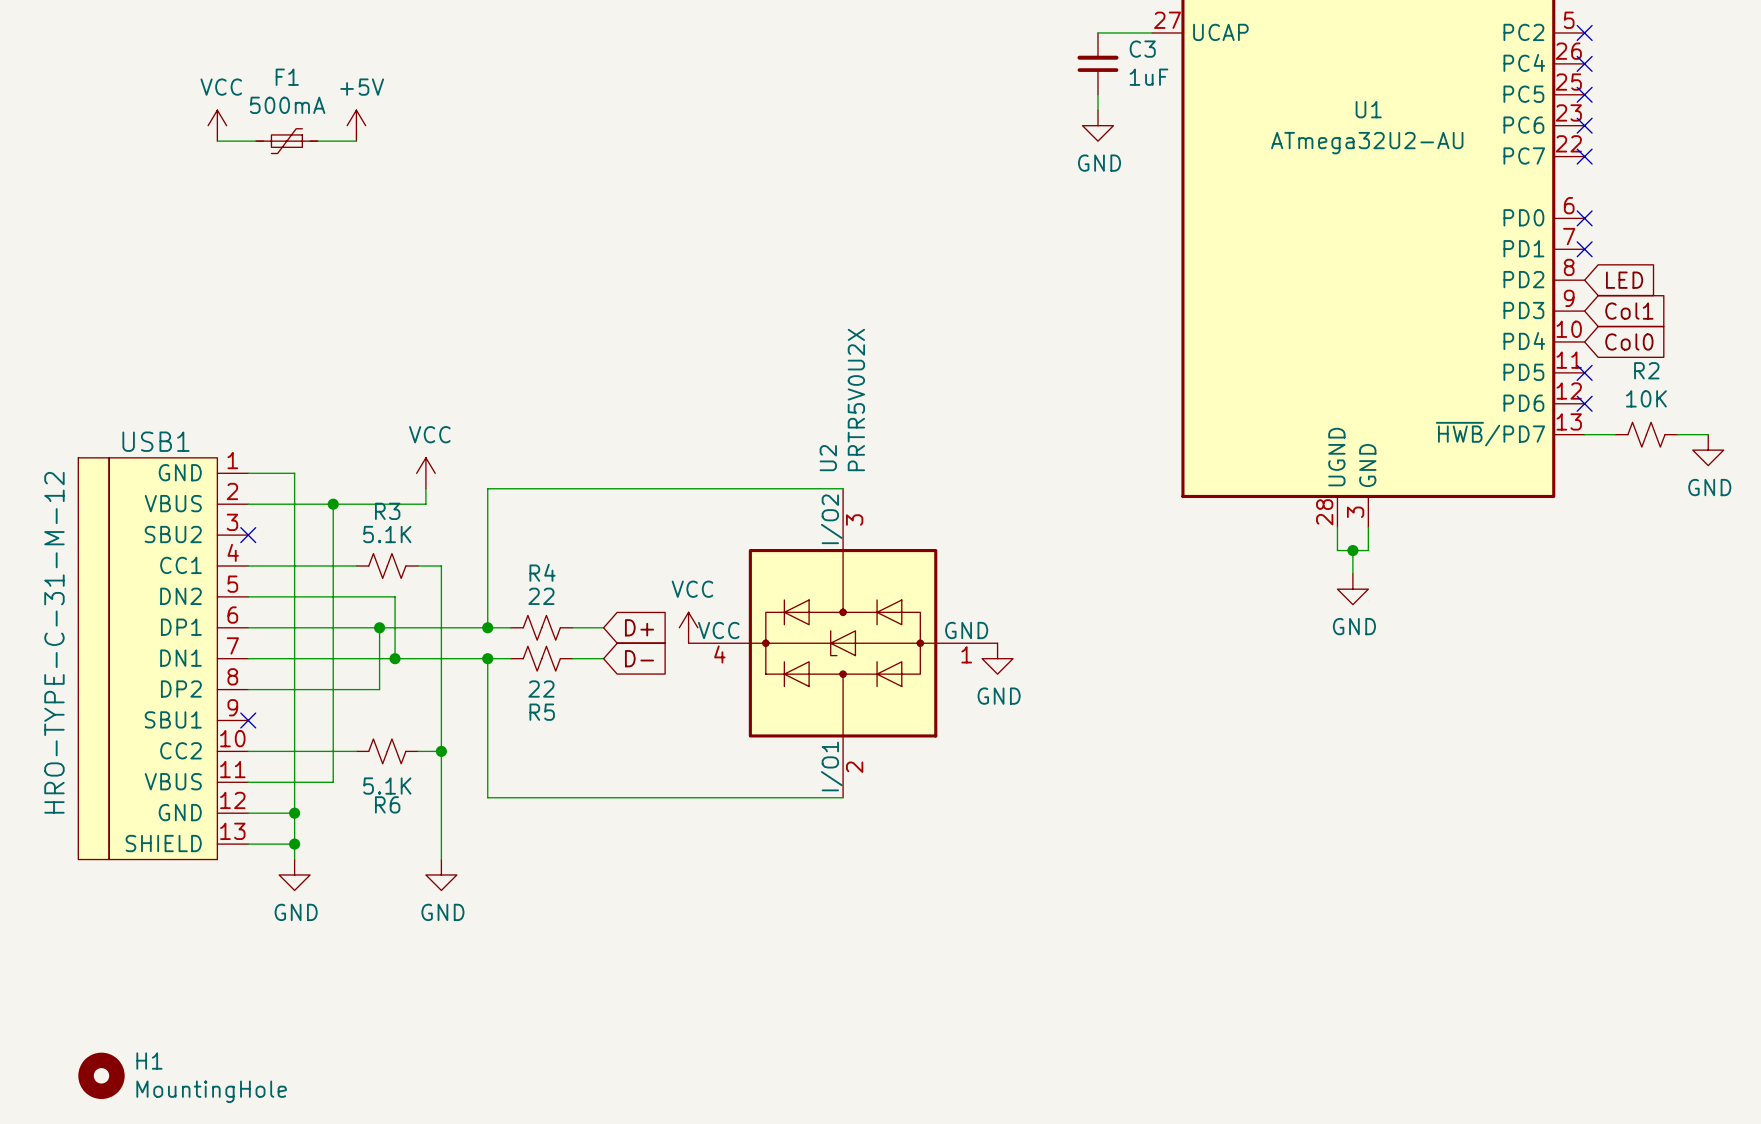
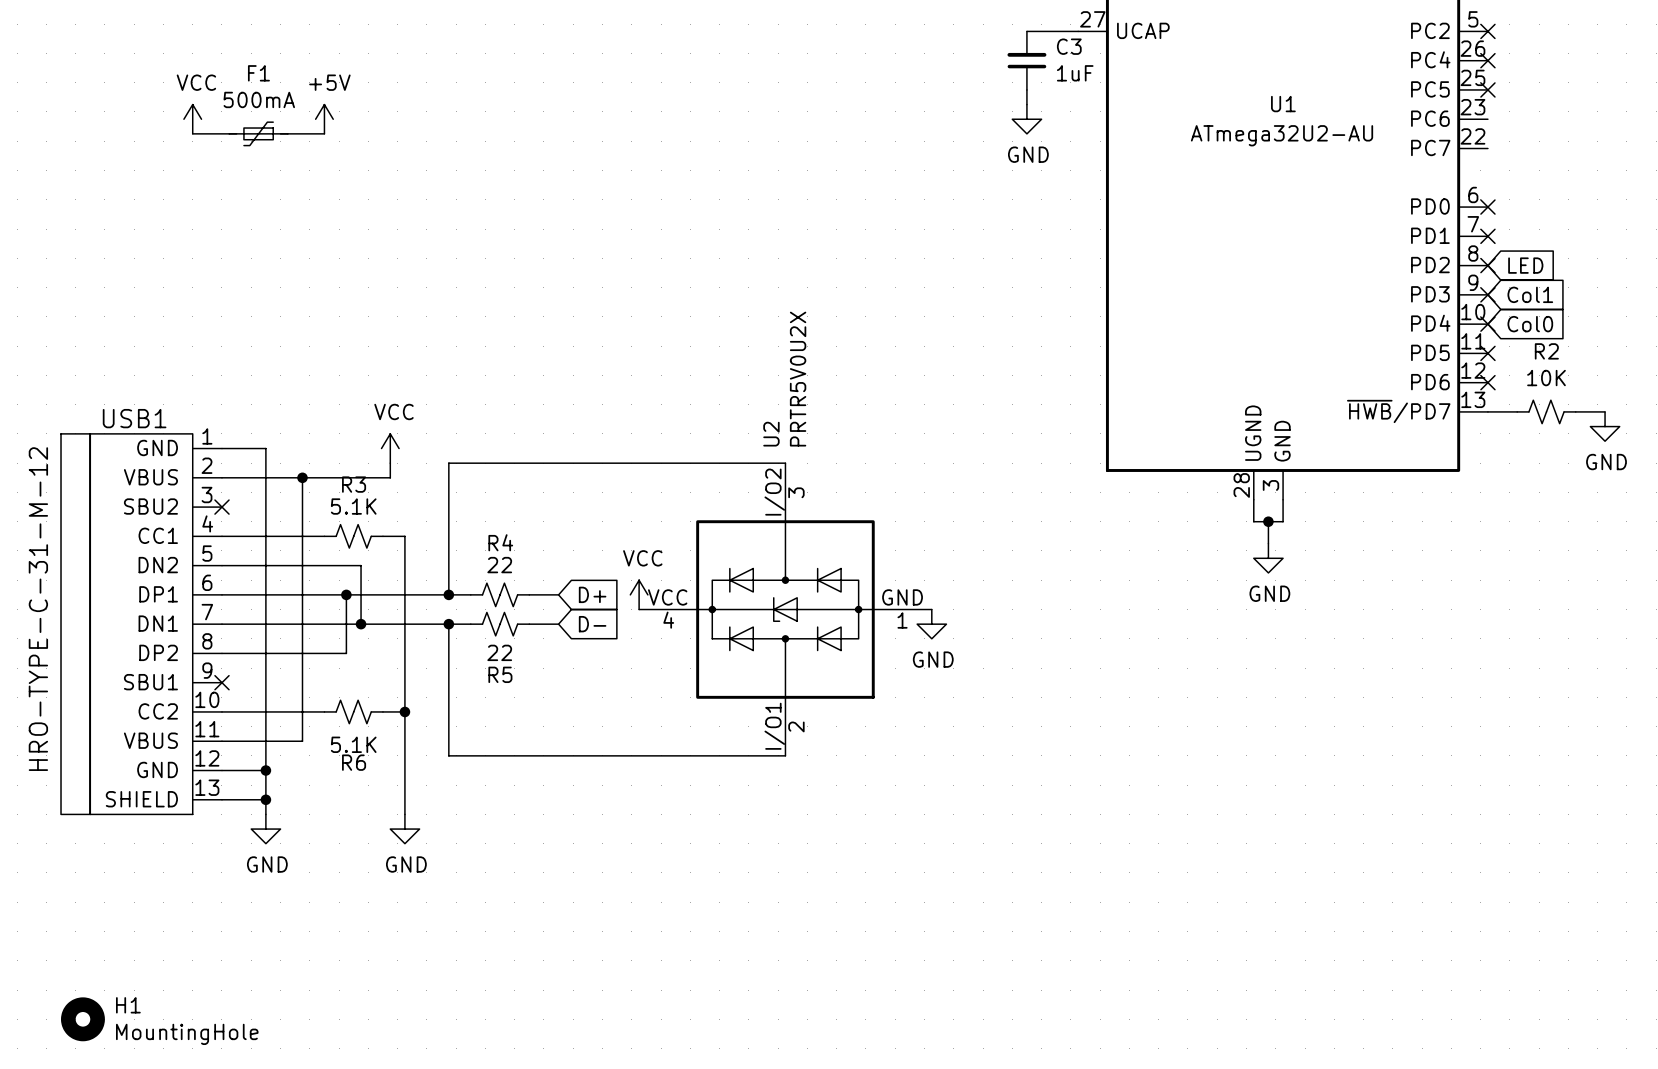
no-connect mark: (1584, 125) -> none
no-connect mark: (1584, 156) -> none
no-connect mark: none -> (1487, 265)
no-connect mark: none -> (1487, 294)
no-connect mark: none -> (1487, 324)

